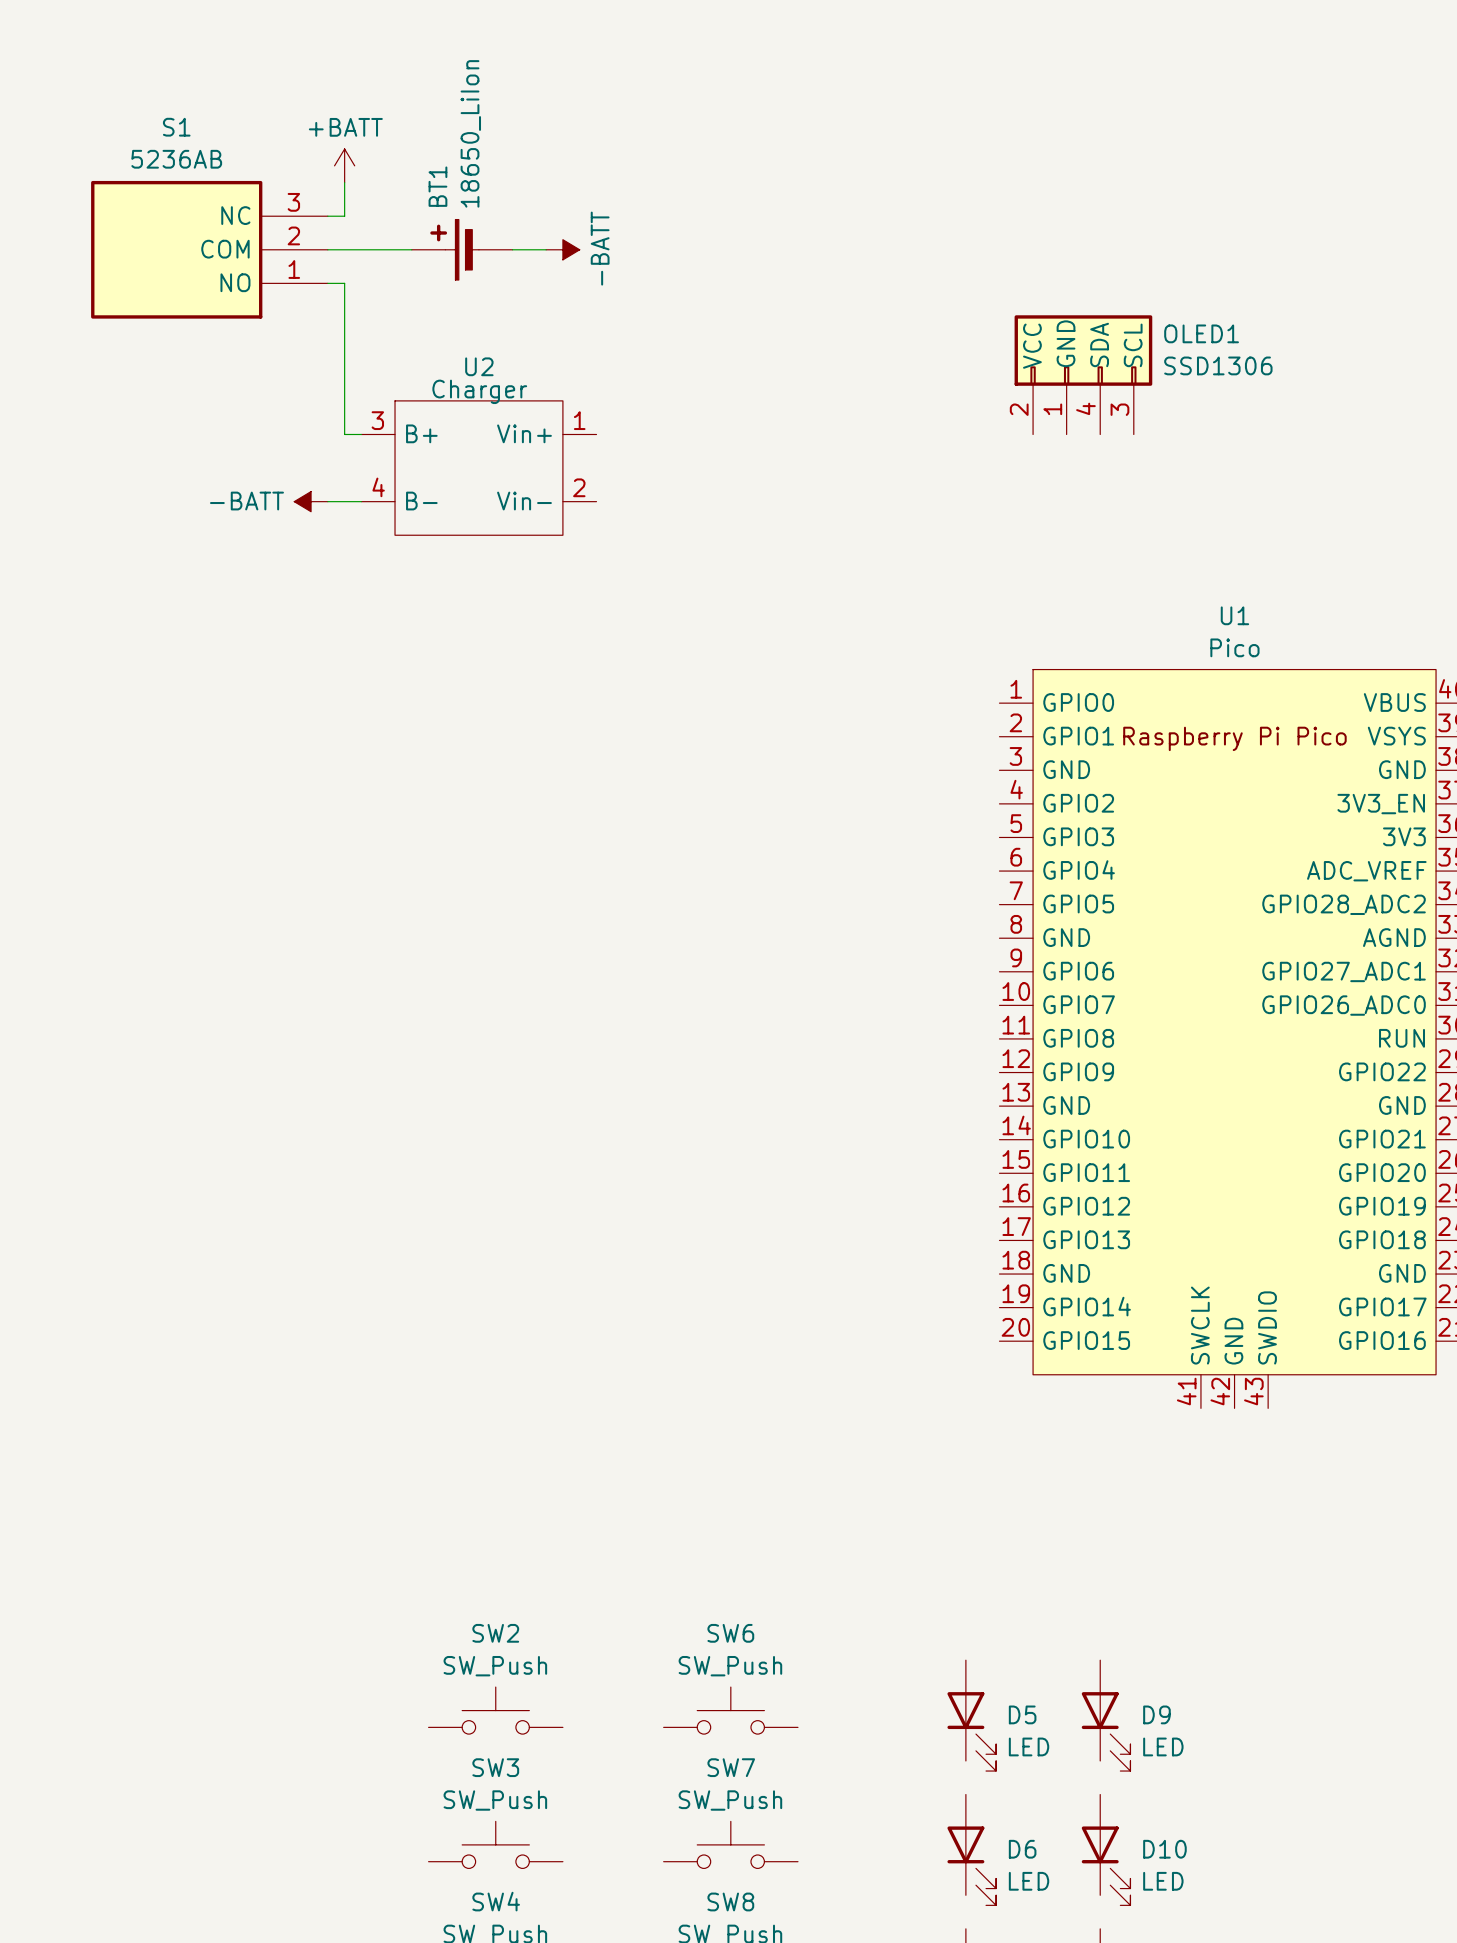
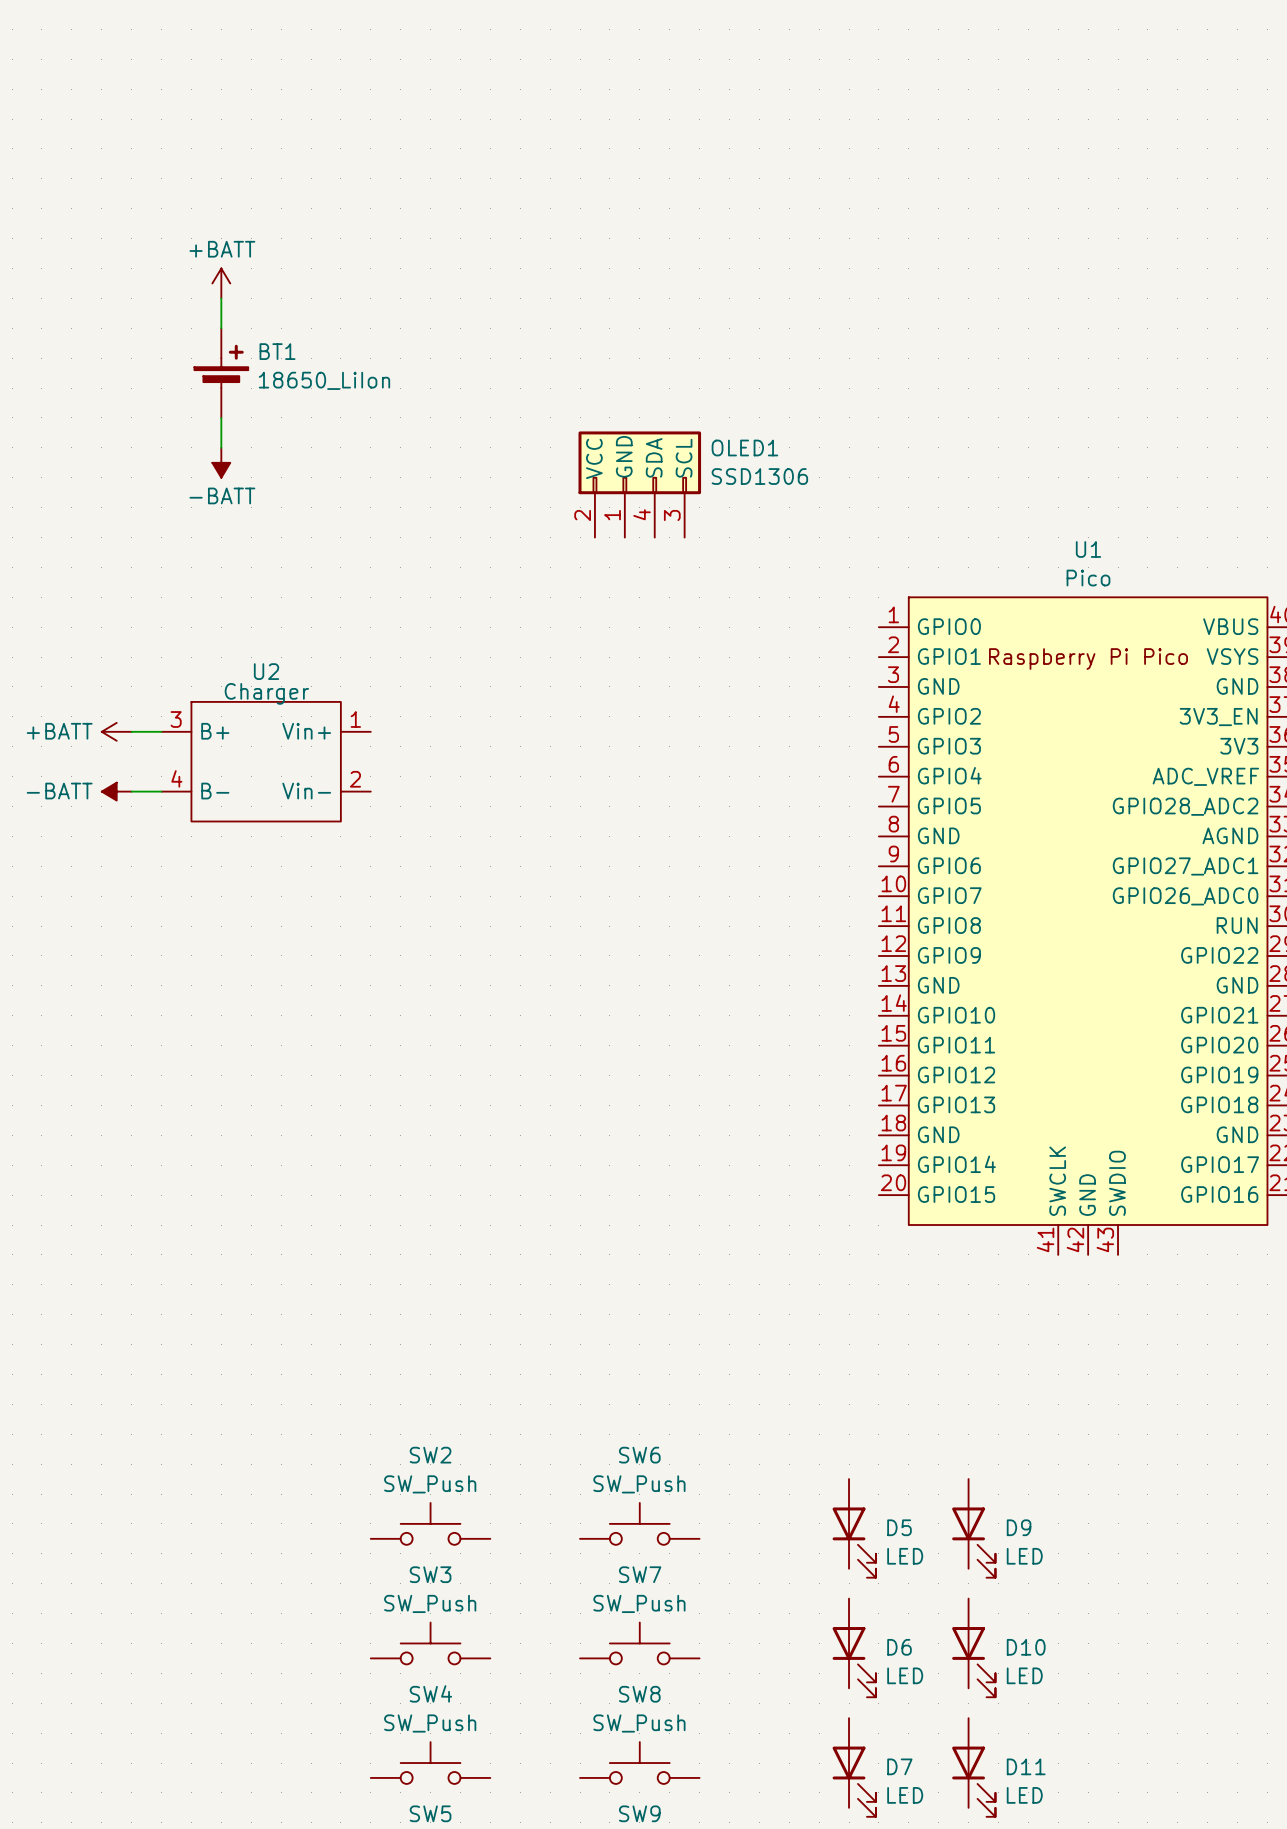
power symbol position: +BATT (344, 165) -> +BATT (221, 283)
wire: (344, 182) (344, 216) (327, 216) -> none
S1: 5236AB (209, 249) -> none
wire: (327, 249) (411, 249) -> none
BT1 rotation: 0° (454, 249) -> 90° clockwise (221, 366)
BT1 position: (462, 249) -> (221, 373)
wire: (512, 249) (546, 249) -> none
power symbol: -BATT (562, 249) -> none
wire: (327, 283) (344, 283) (344, 434) (361, 434) -> none
wire: none -> (221, 298) (221, 328)
OLED1 position: (1083, 374) -> (639, 484)
wire: none -> (221, 417) (221, 447)
U2 position: (478, 468) -> (266, 761)
power symbol text position: -BATT (246, 501) -> -BATT (222, 495)
power symbol rotation: 0° (311, 501) -> 90° counterclockwise (221, 462)
power symbol position: -BATT (311, 501) -> -BATT (221, 462)
wire: (327, 501) (361, 501) -> none
power symbol: none -> +BATT (116, 731)
wire: none -> (131, 731) (161, 731)
power symbol: none -> -BATT (116, 791)
wire: none -> (131, 791) (161, 791)

